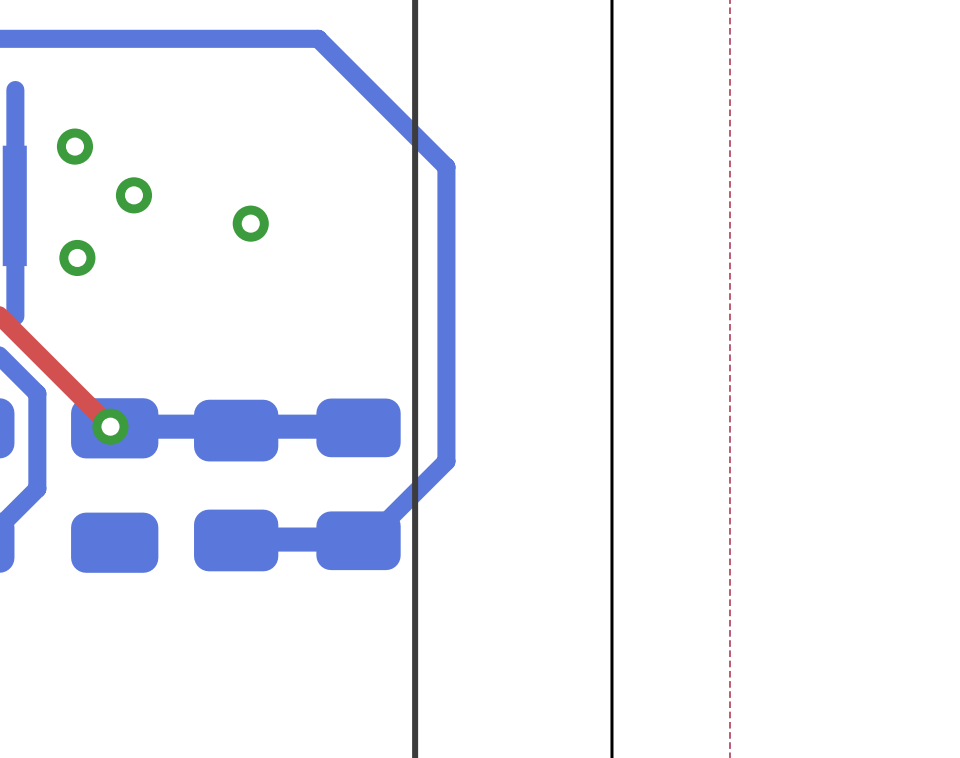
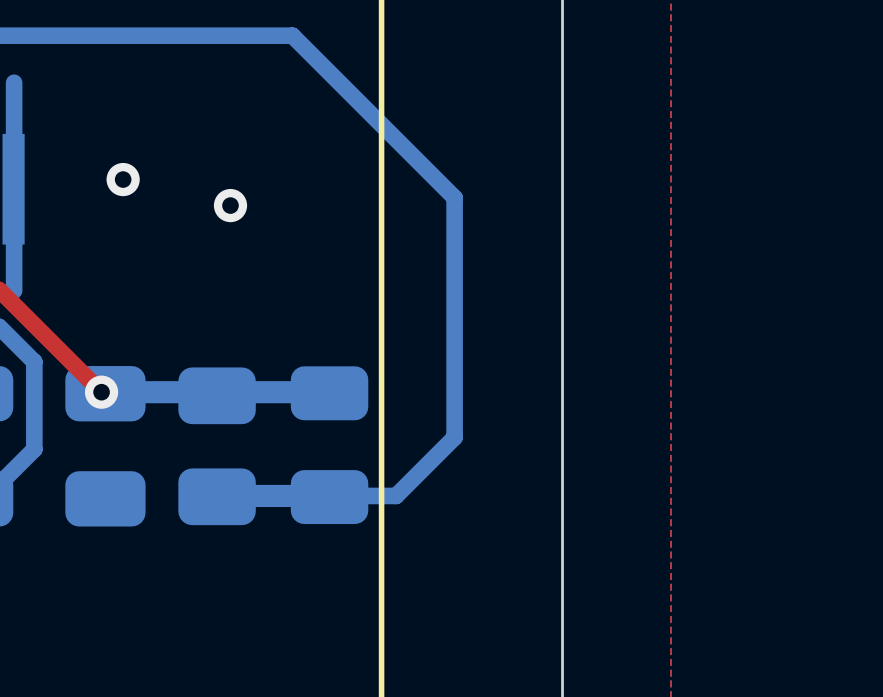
via: (74, 146) -> none
bottom track: (446, 167) (446, 461) (368, 539) -> (410, 153) (454, 197) (454, 437) (396, 495) (338, 495)
via: (77, 257) -> none

